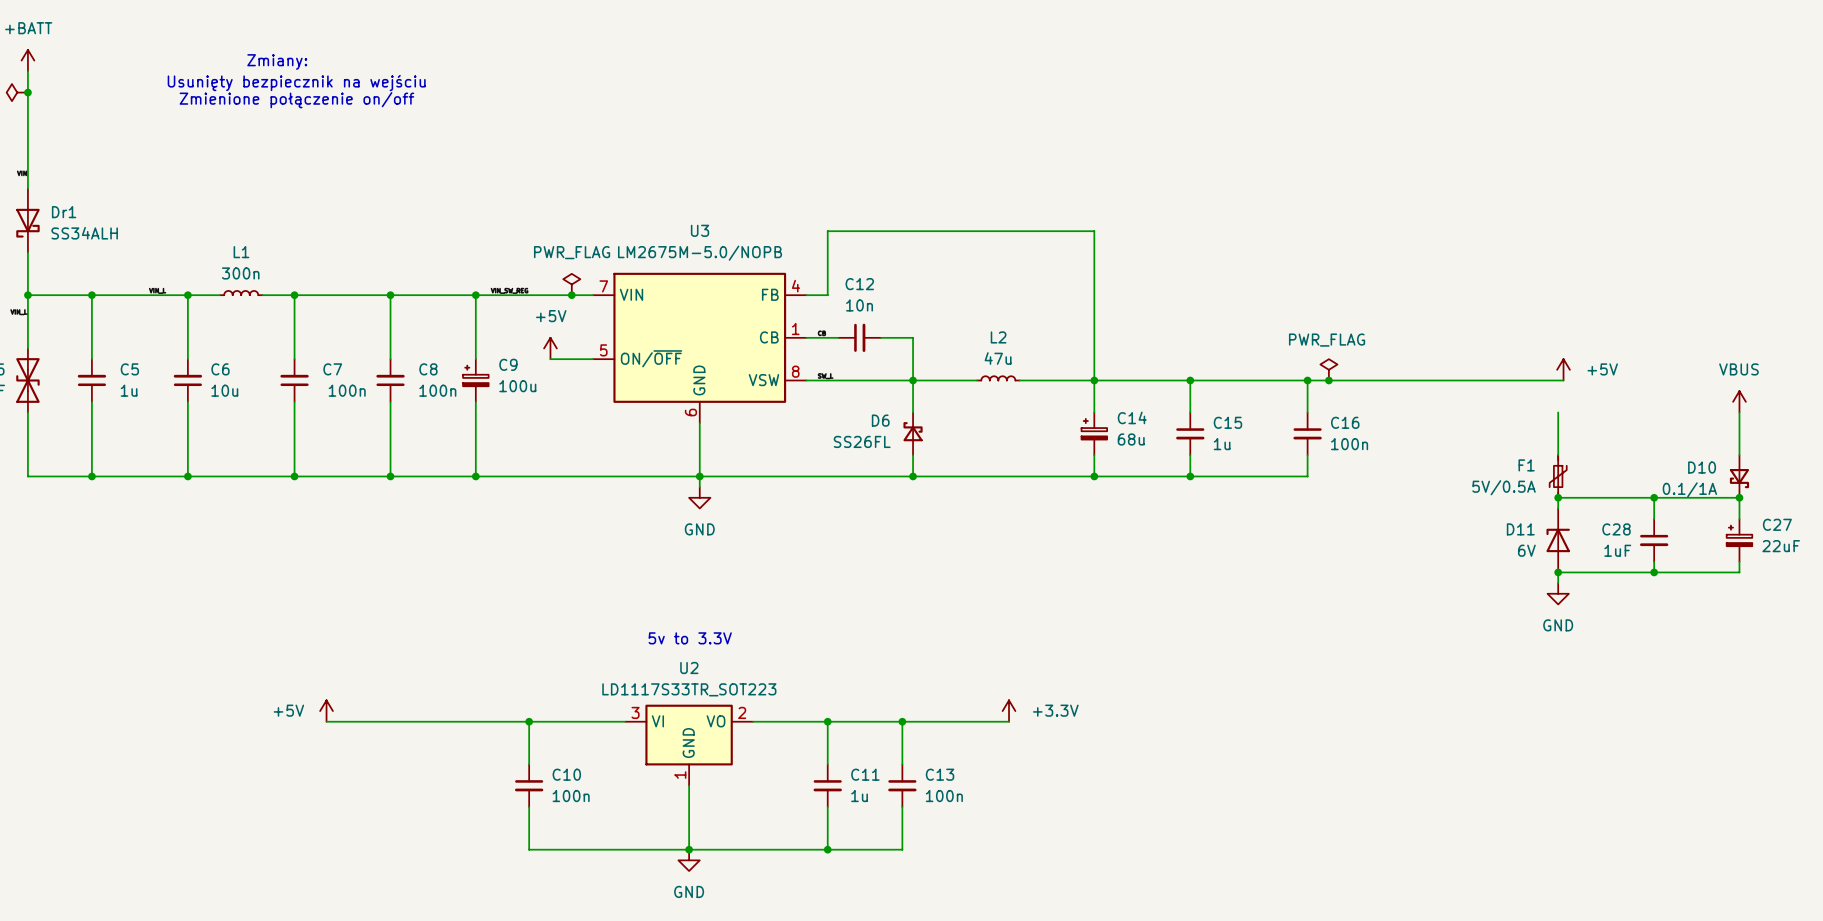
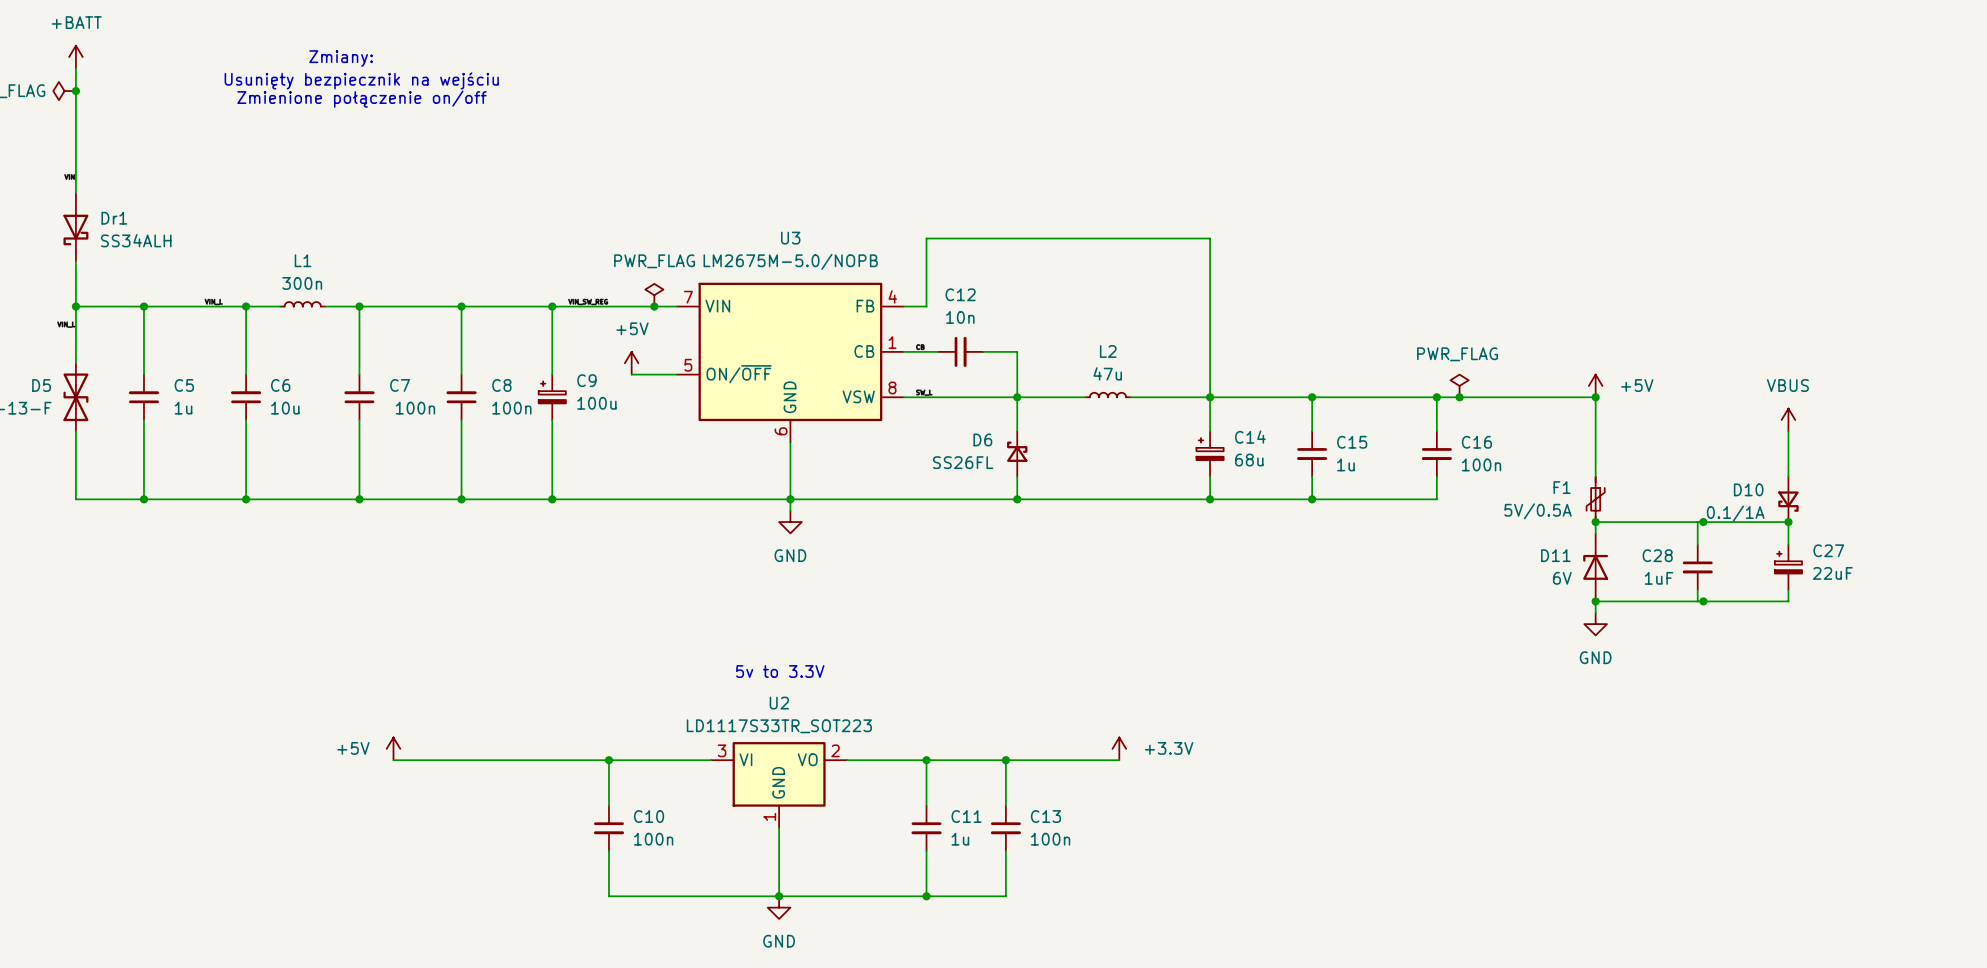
power symbol position: +5V (1563, 369) -> +5V (1595, 385)
wire: (1456, 380) (1563, 380) -> (1595, 397) (1595, 476)
junction: none -> (1595, 397)
power symbol position: VBUS (1739, 401) -> VBUS (1788, 419)
wire: (1558, 412) (1558, 455) -> none
wire: (1739, 412) (1739, 455) -> (1788, 431) (1788, 476)
F1 position: (1558, 476) -> (1595, 499)
D10 position: (1739, 476) -> (1788, 499)
junction: none -> (1595, 522)
wire: (1558, 497) (1558, 508) -> (1703, 522) (1595, 522) (1595, 533)
wire: (1638, 497) (1739, 497) (1739, 519) -> (1788, 522) (1788, 544)
wire: (1654, 497) (1654, 519) -> (1697, 522) (1697, 544)
junction position: (1654, 497) -> (1788, 522)
junction: (1739, 497) -> none
D11 position: (1558, 540) -> (1595, 567)
C28 position: (1654, 540) -> (1697, 567)
C27 position: (1739, 540) -> (1788, 567)
wire: (1654, 561) (1654, 572) -> (1697, 590) (1697, 601)
wire: (1739, 561) (1739, 572) (1638, 572) -> (1788, 590) (1788, 601)
junction: none -> (1595, 601)
wire: (1558, 572) (1558, 583) -> (1703, 601) (1595, 601) (1595, 612)
junction: (1654, 572) -> none
power symbol position: GND (1558, 593) -> GND (1595, 624)

